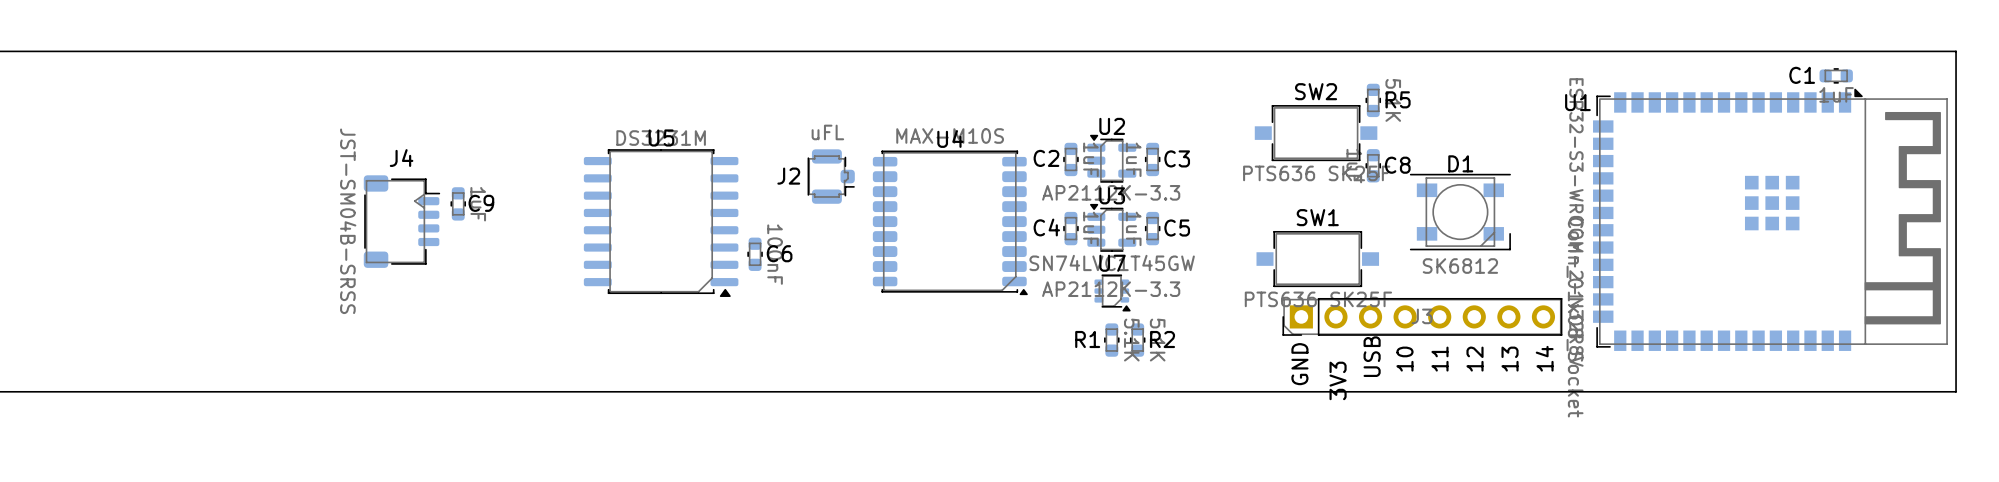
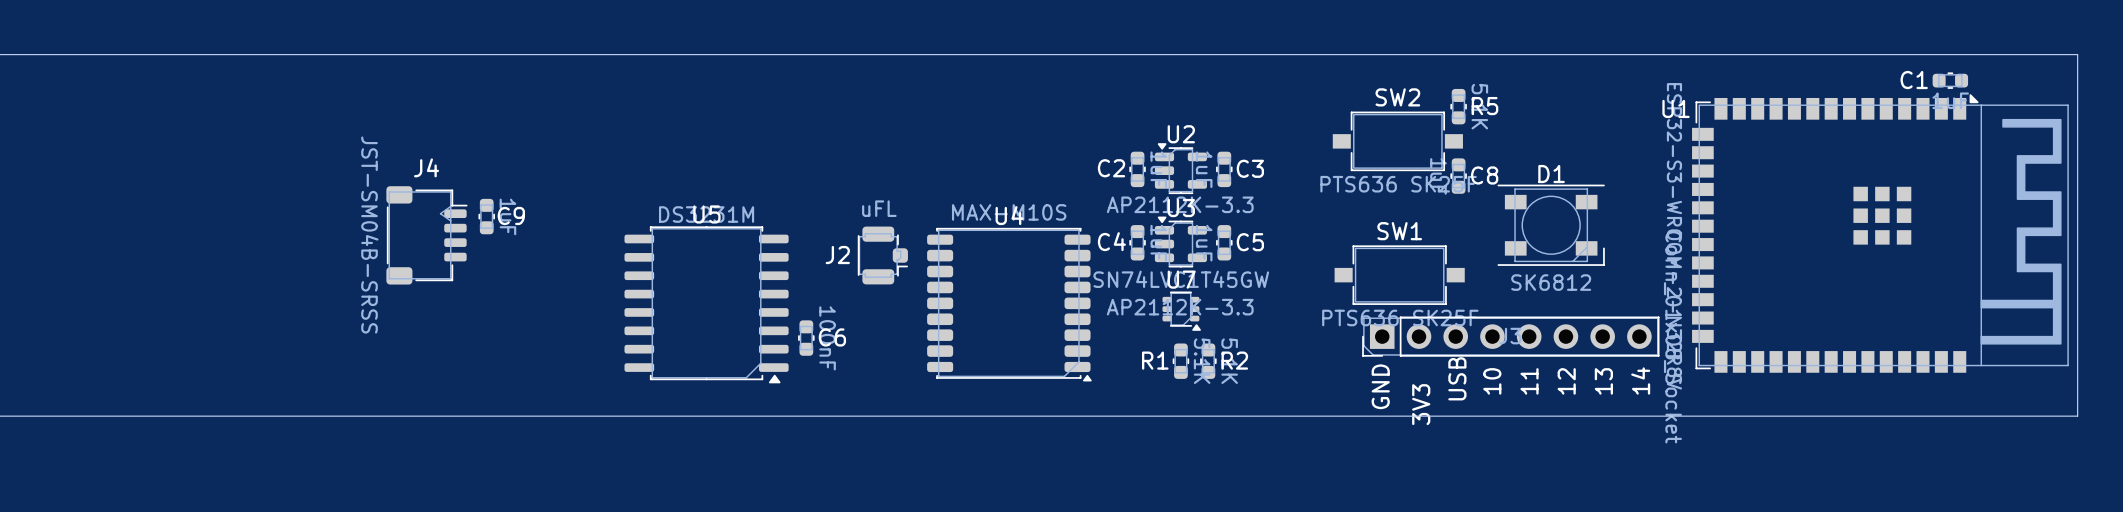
J2 position: (831, 176) -> (882, 255)
U4 position: (950, 222) -> (1009, 304)
U5 position: (661, 223) -> (706, 304)
C6 position: (755, 254) -> (806, 338)

